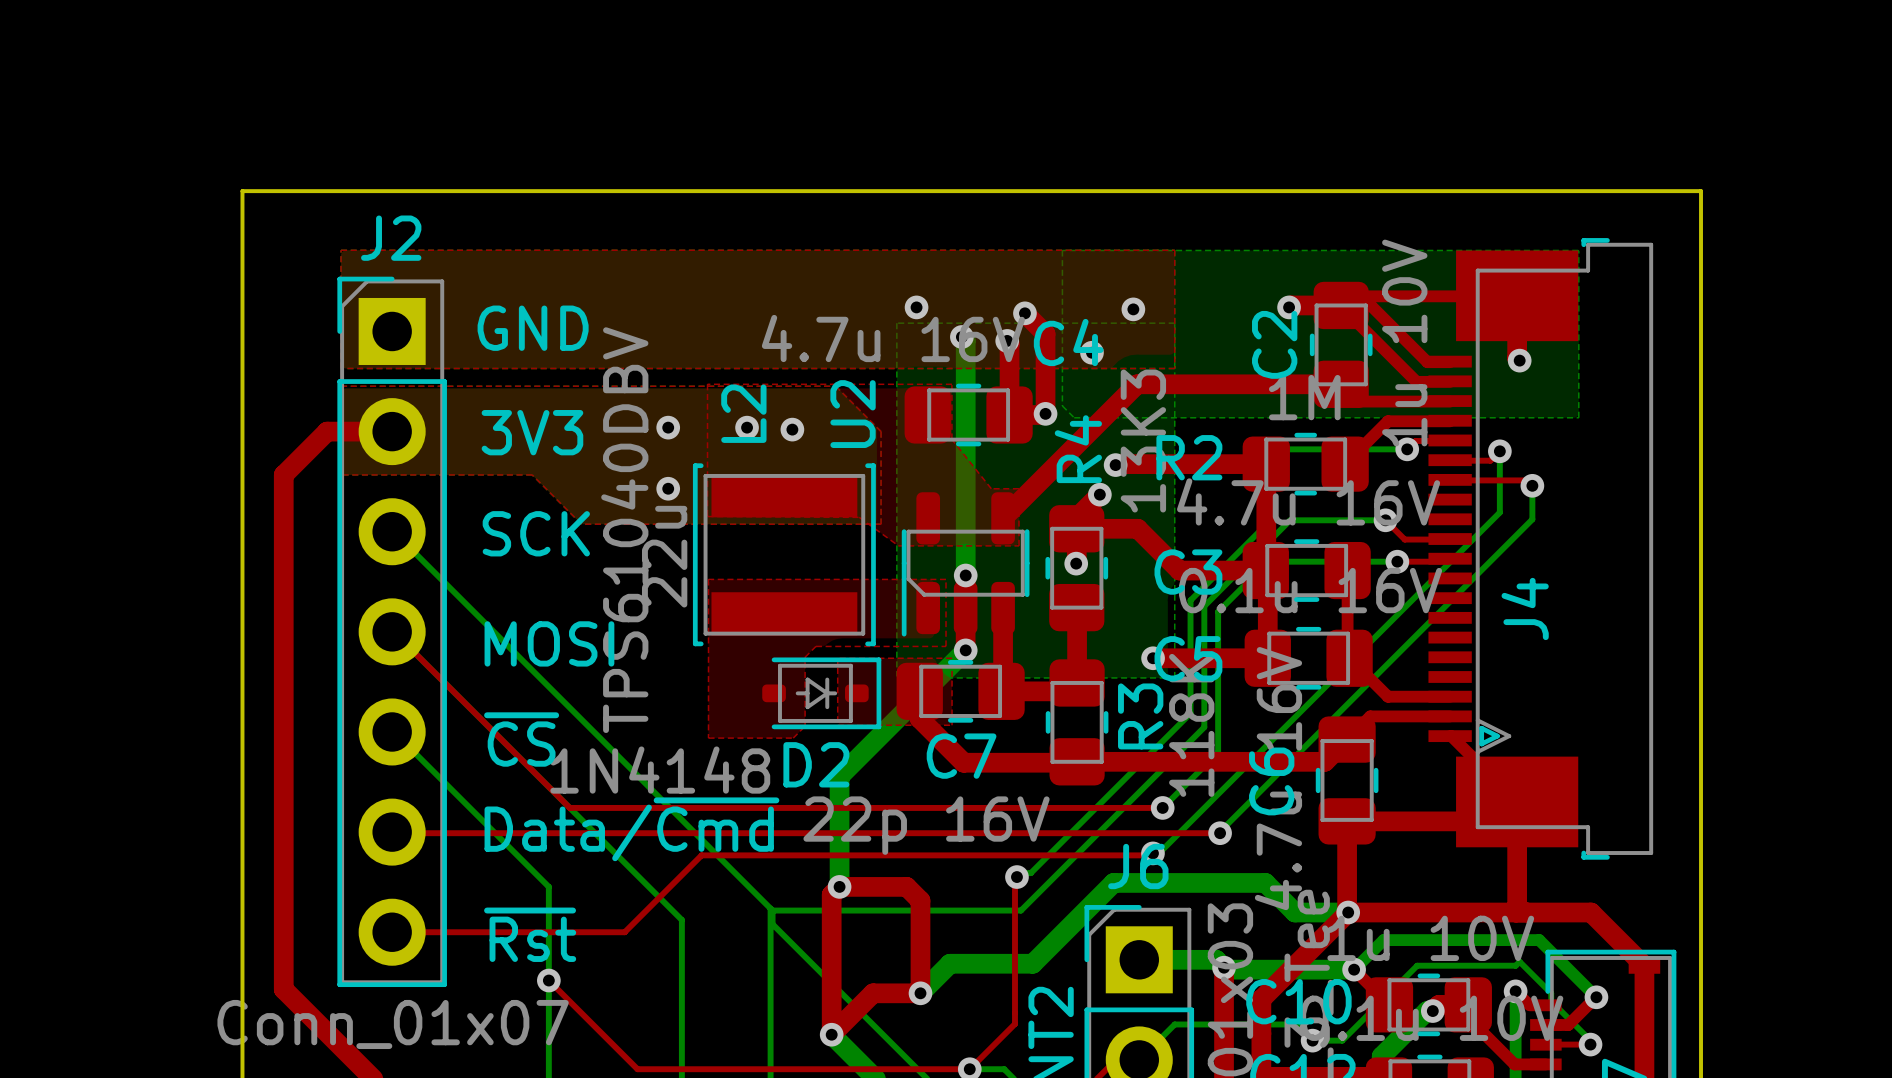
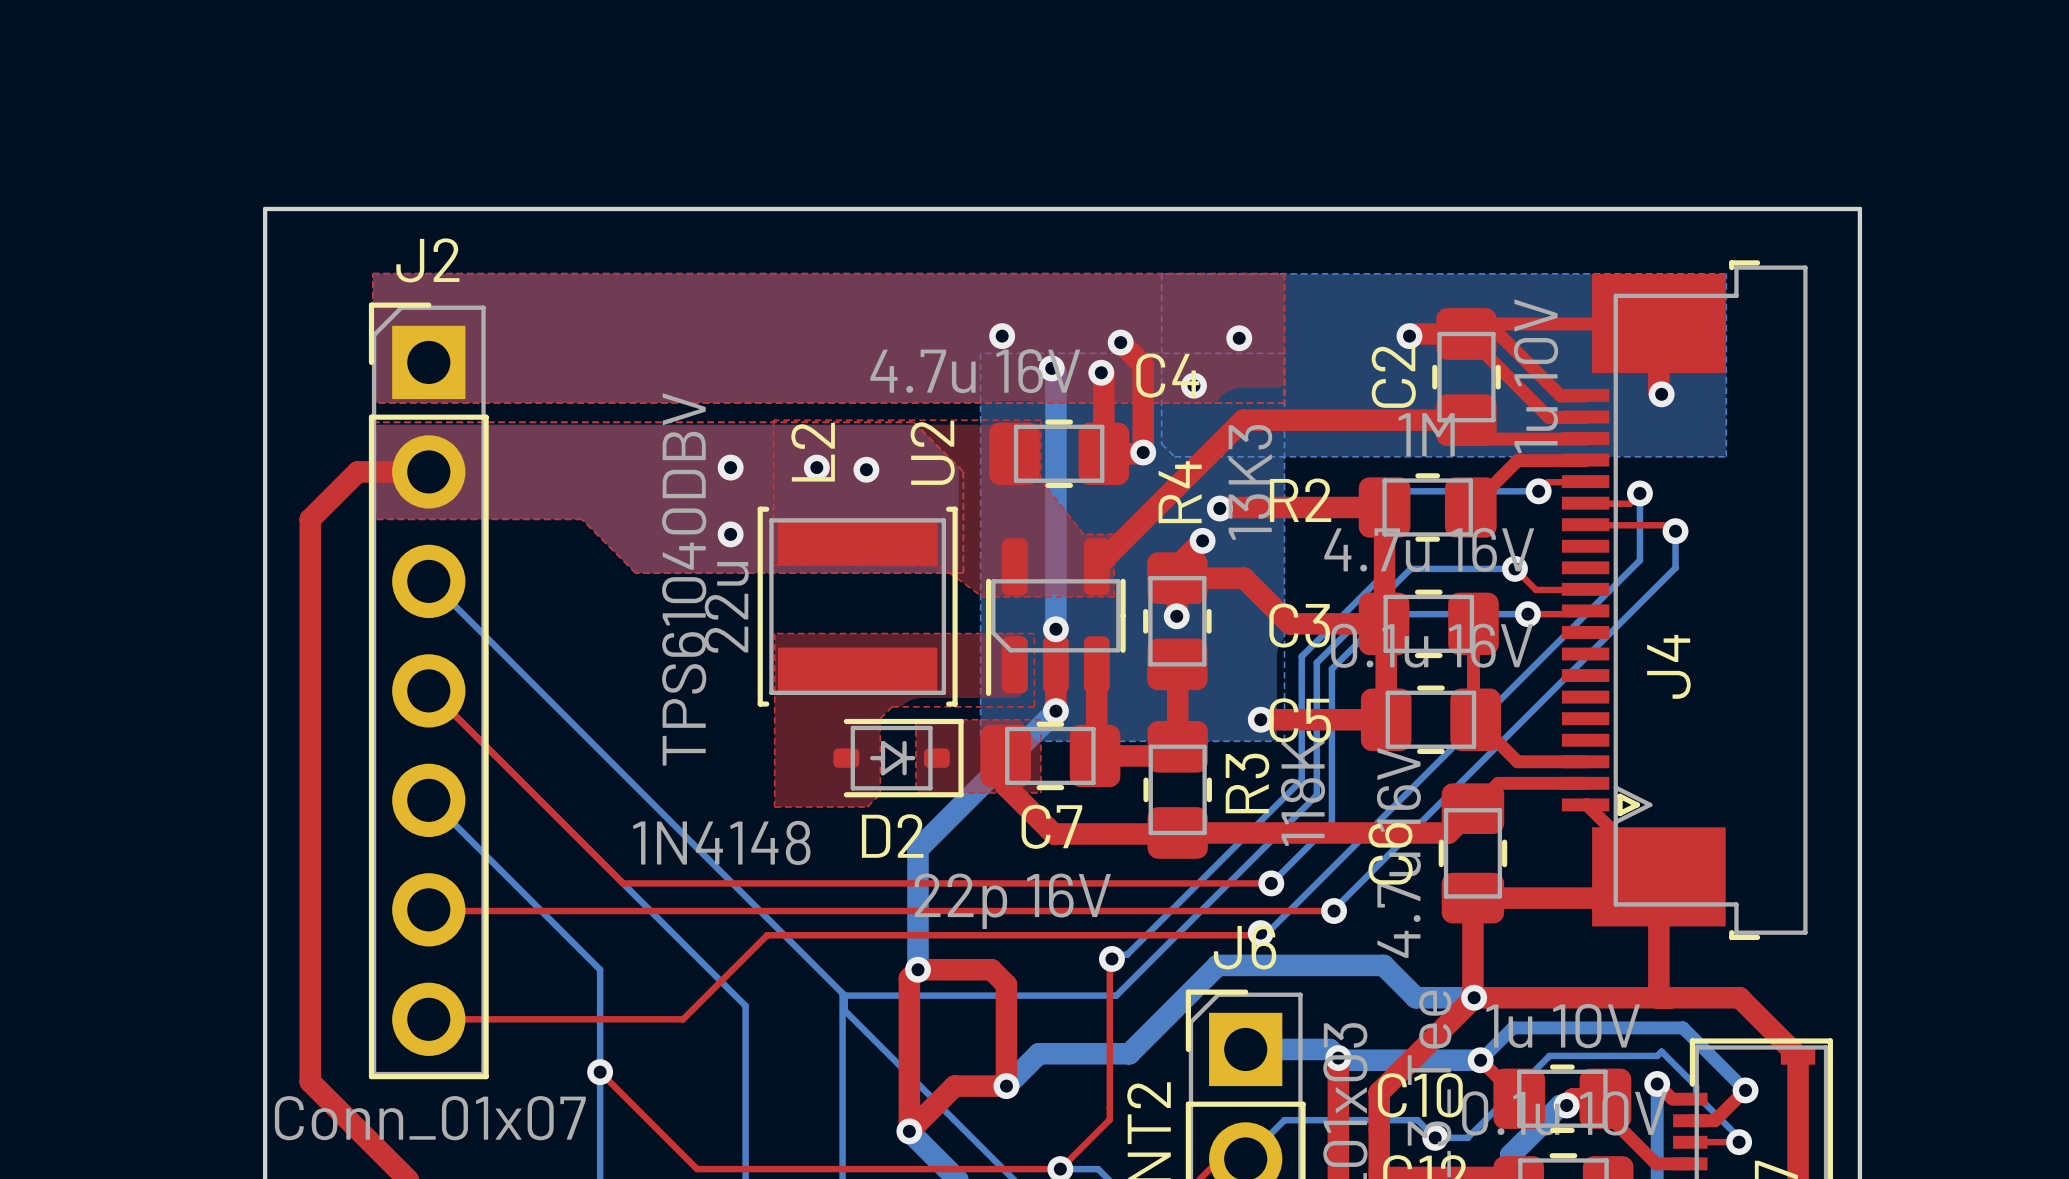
text: GND (533, 328) -> none
text: 3V3 (532, 432) -> none
text: SCK (536, 533) -> none
text: MOSI (549, 643) -> none
text: ~{CS} (521, 739) -> none
text: Data/~{Cmd} (631, 829) -> none
text: ~{Rst} (530, 934) -> none

